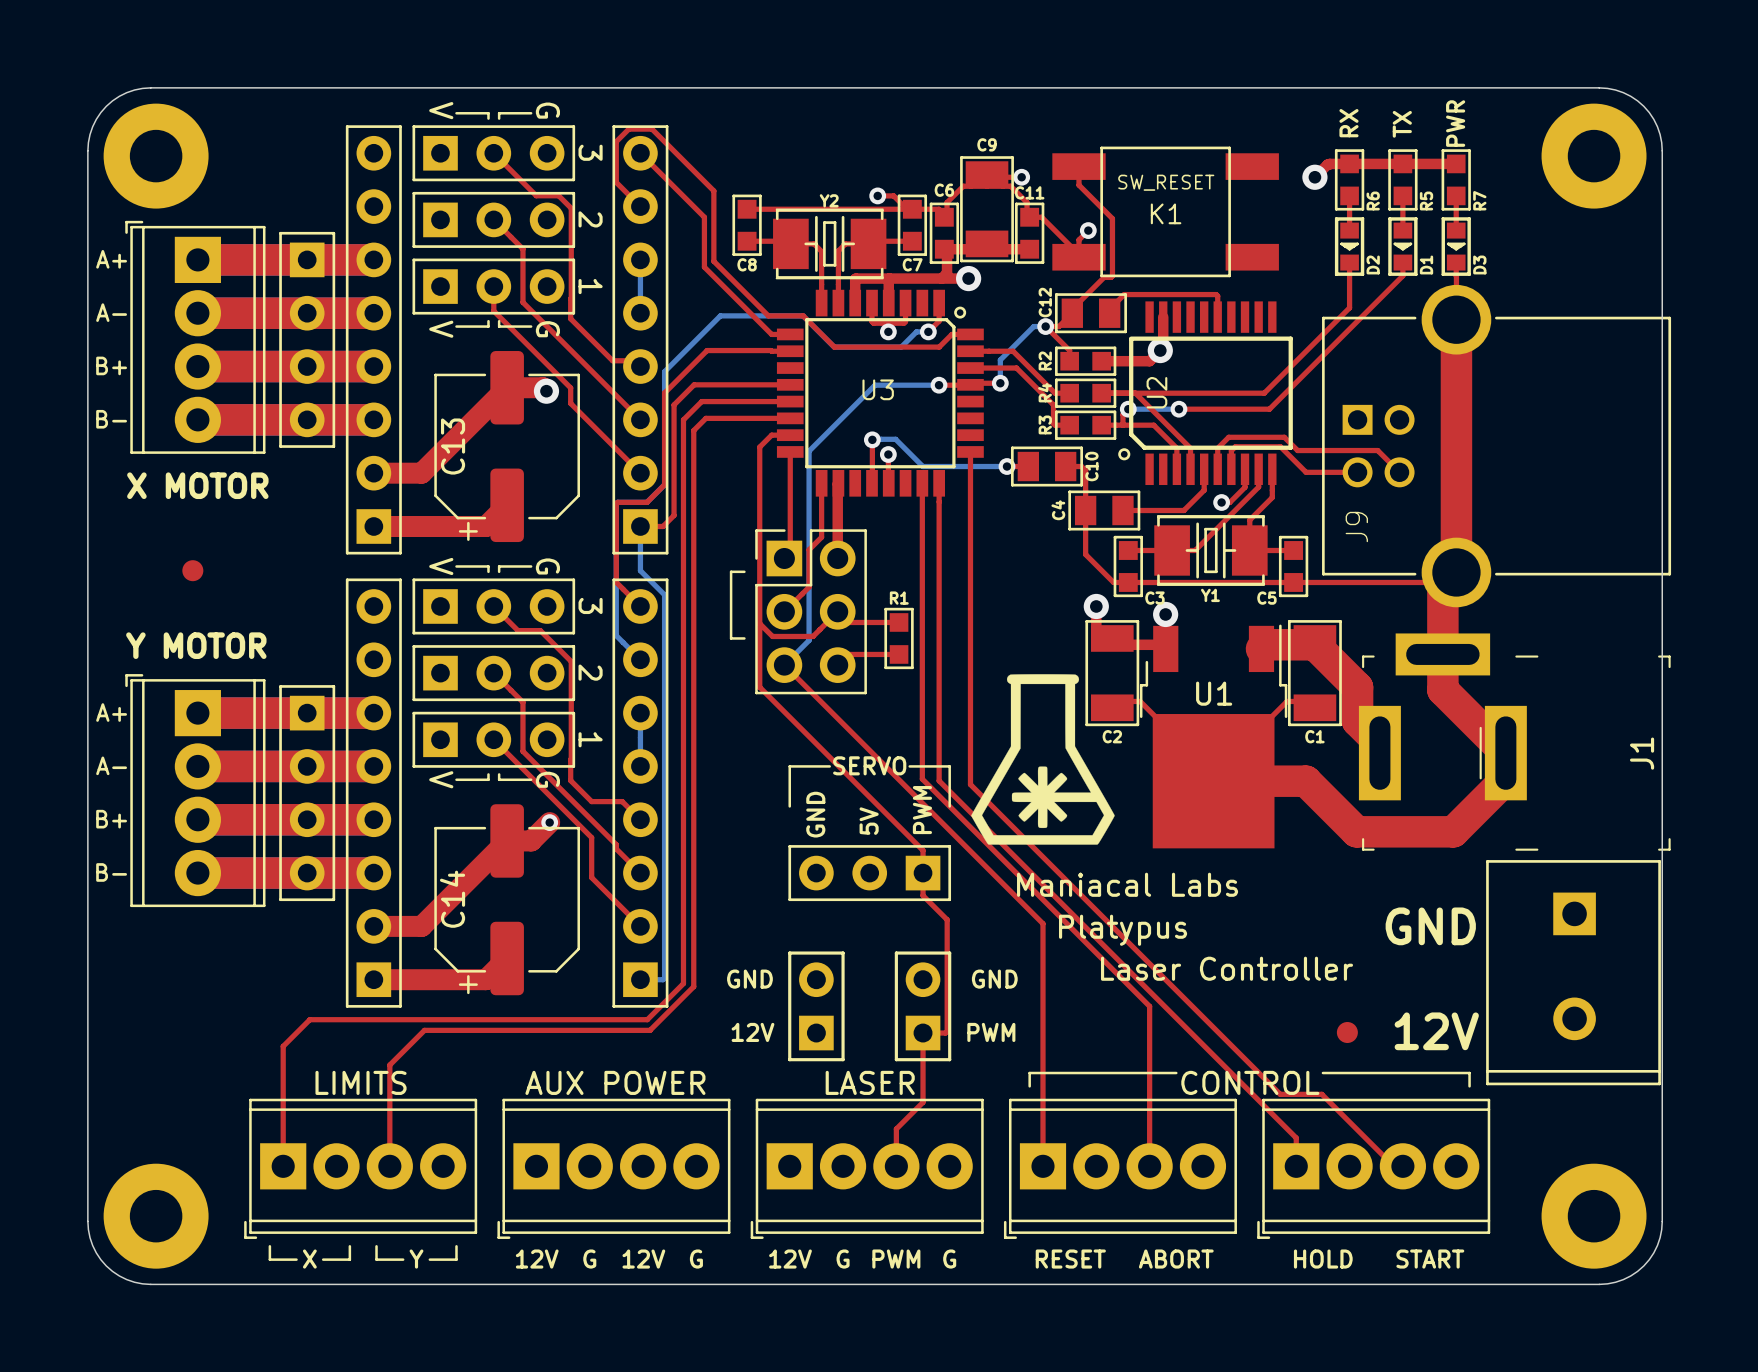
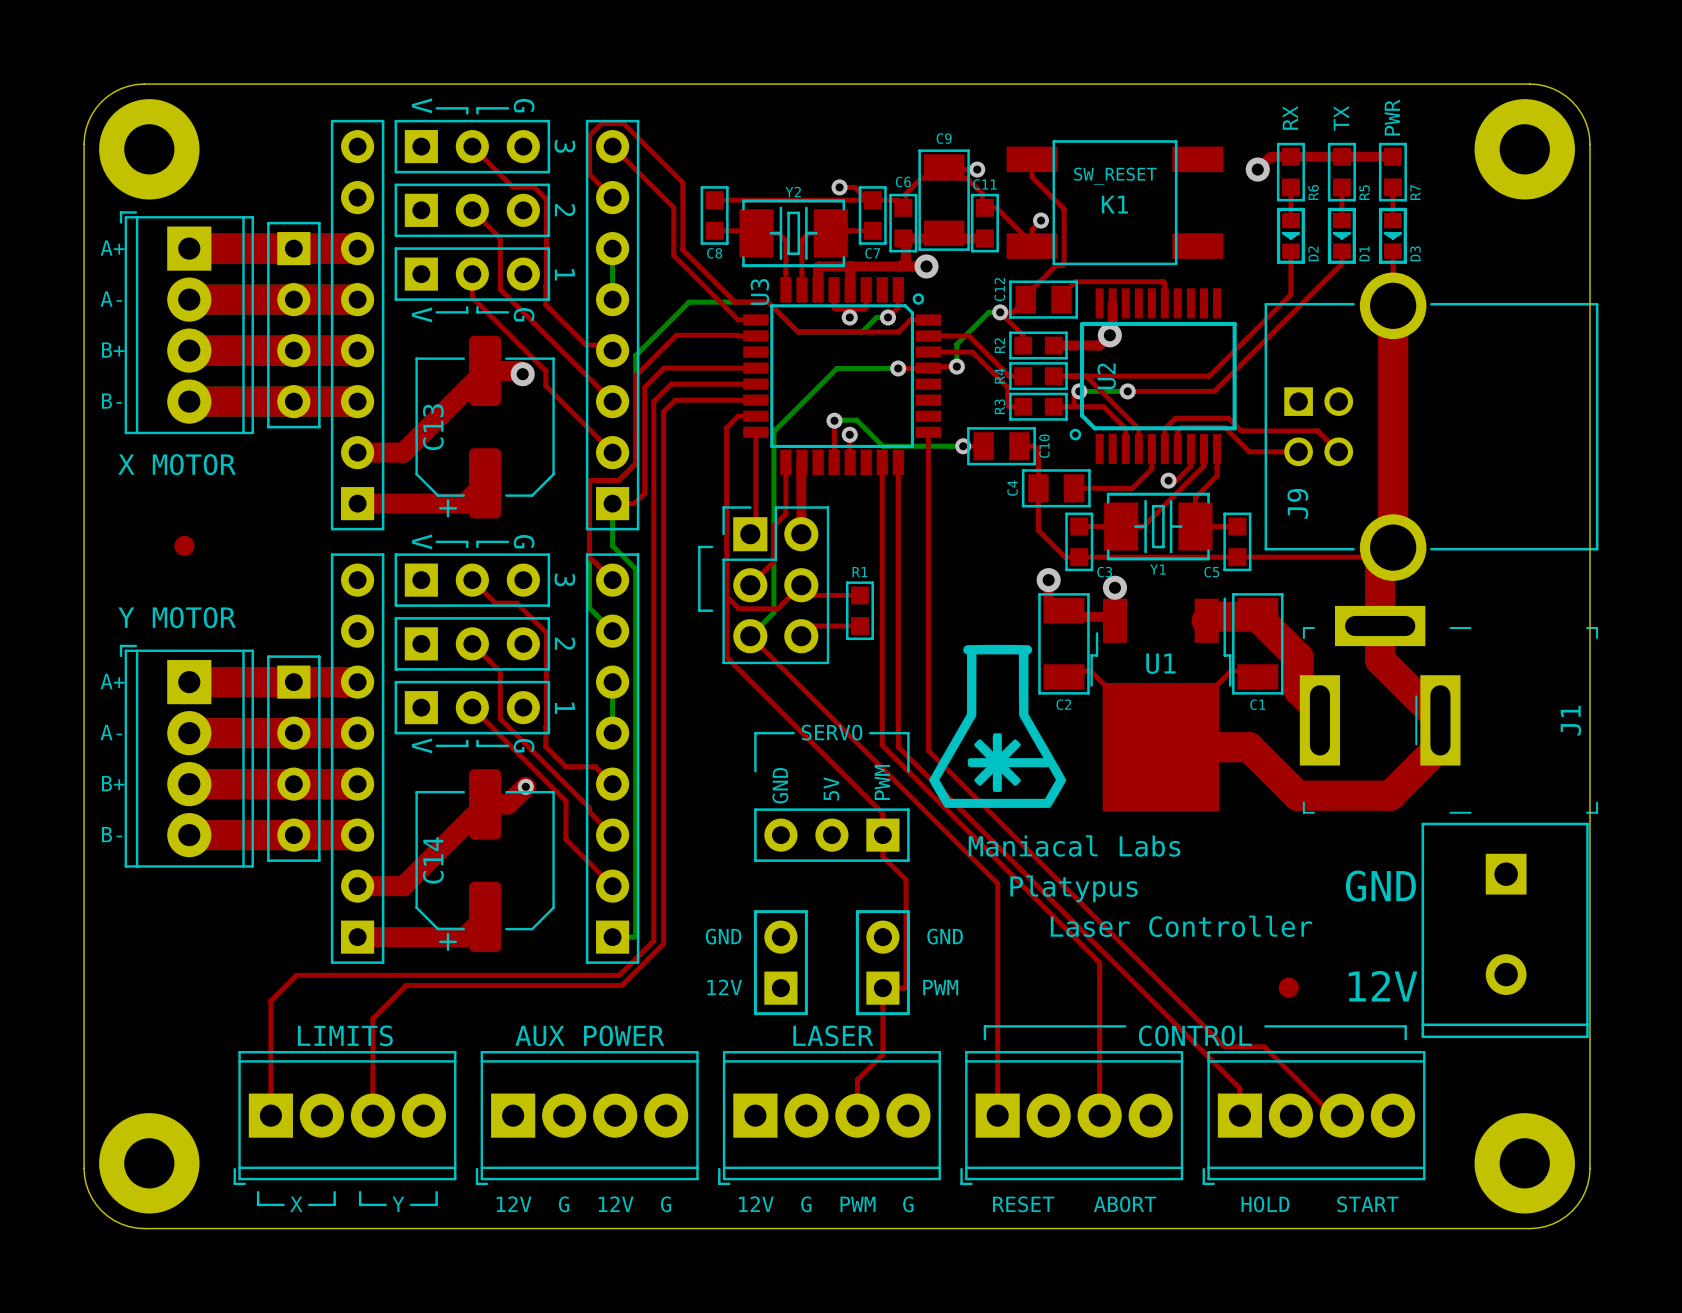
U3 name rotation: 0° (878, 389) -> 90° counterclockwise (759, 292)
U3 name position: U3 (878, 389) -> U3 (759, 292)

